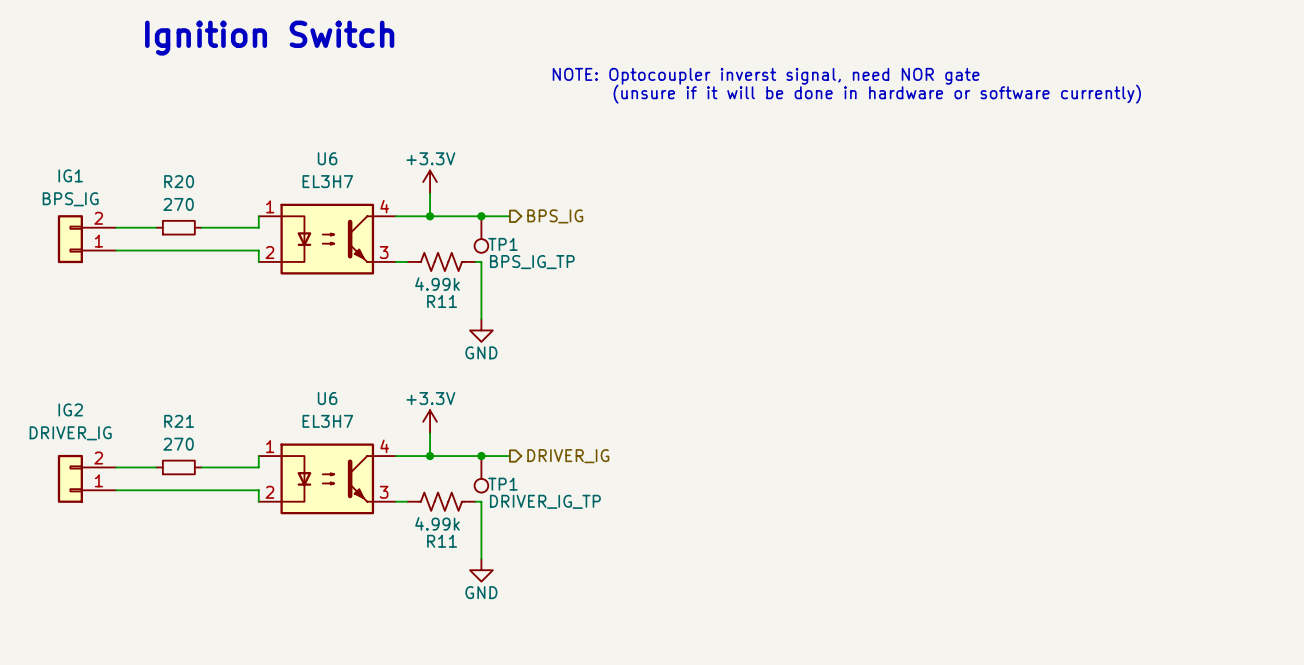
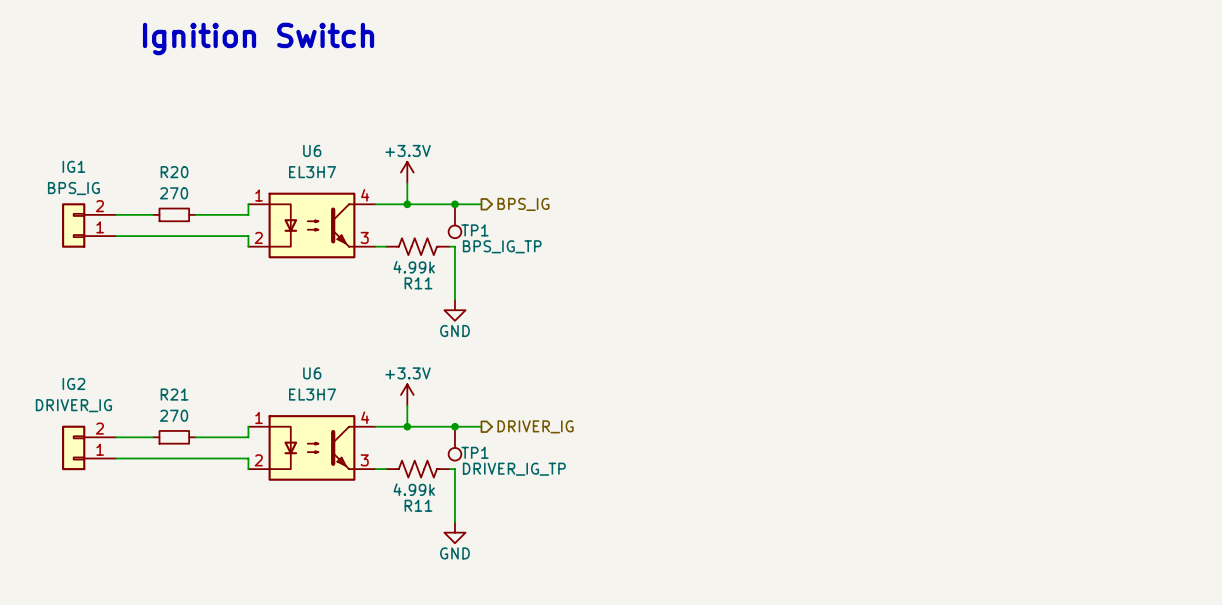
text: NOTE: Optocoupler inverst signal, need NOR gate (766, 76) -> none
text: (unsure if it will be done in hardware or software currently) (877, 94) -> none

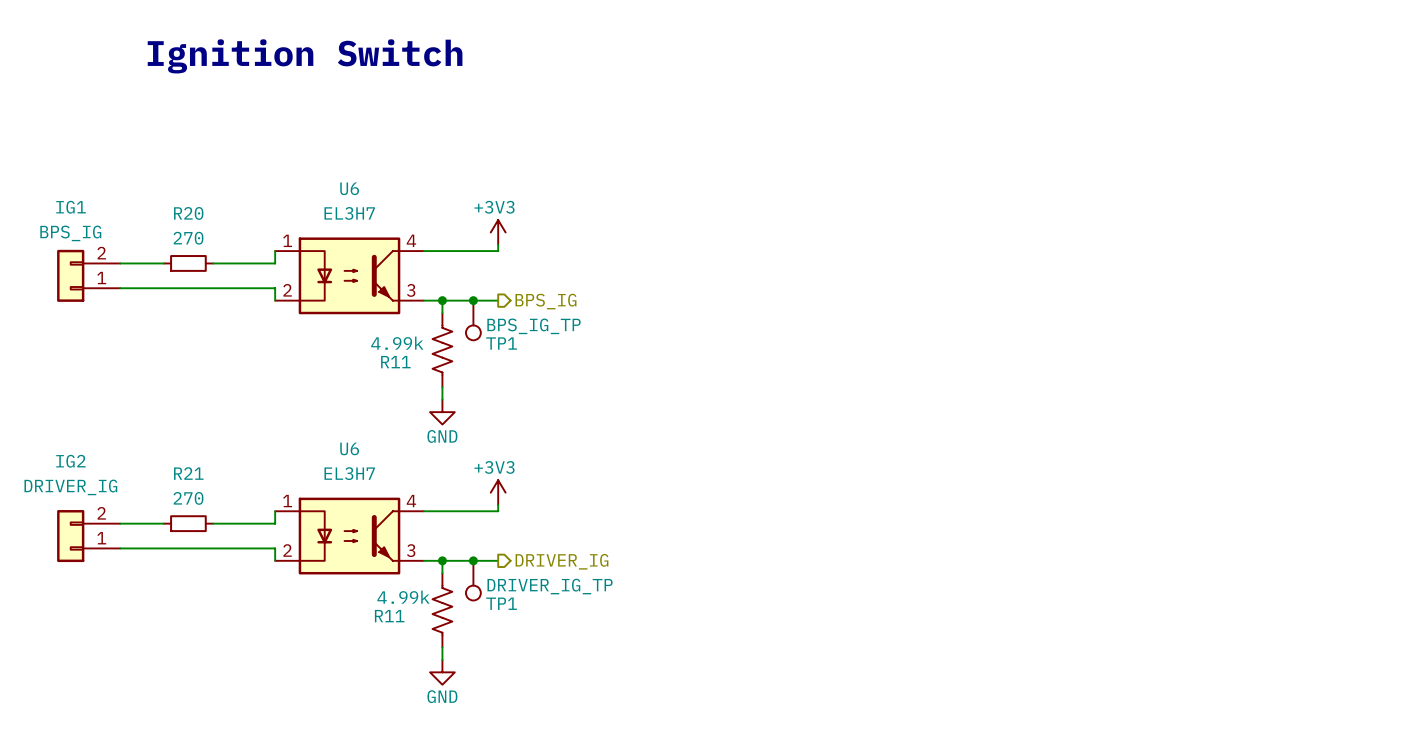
power symbol: +3.3V (407, 172) -> none
wire: (407, 183) (407, 204) -> none
power symbol: none -> +3V3 (498, 232)
junction: (407, 204) -> none
wire: (439, 204) (481, 204) -> (498, 251) (498, 244)
junction: (454, 204) -> none
hierarchical label position: BPS_IG (523, 204) -> BPS_IG (545, 301)
TP1 position: (454, 221) -> (473, 320)
TP1 name position: TP1 (474, 230) -> TP1 (501, 343)
wire: none -> (442, 300) (442, 313)
junction: none -> (442, 300)
junction: none -> (473, 300)
R11 rotation: 0° (417, 246) -> 90° clockwise (442, 350)
R11 position: (417, 246) -> (442, 350)
wire: (449, 246) (454, 246) (454, 299) -> none
TP1 value position: BPS_IG_TP (502, 246) -> BPS_IG_TP (534, 326)
R11 value position: 4.99k (414, 267) -> 4.99k (397, 343)
power symbol position: GND (454, 310) -> GND (442, 412)
wire: none -> (442, 387) (442, 399)
power symbol: +3.3V (407, 394) -> none
wire: (407, 405) (407, 426) -> none
power symbol: none -> +3V3 (498, 492)
junction: (407, 426) -> none
wire: (439, 426) (481, 426) -> (498, 511) (498, 505)
junction: (454, 426) -> none
hierarchical label position: DRIVER_IG (535, 426) -> DRIVER_IG (562, 561)
TP1 position: (454, 443) -> (473, 580)
TP1 name position: TP1 (474, 452) -> TP1 (501, 603)
wire: none -> (442, 560) (442, 573)
junction: none -> (442, 560)
junction: none -> (473, 560)
R11 rotation: 0° (417, 469) -> 90° clockwise (442, 610)
R11 position: (417, 469) -> (442, 610)
wire: (449, 469) (454, 469) (454, 522) -> none
TP1 value position: DRIVER_IG_TP (514, 469) -> DRIVER_IG_TP (550, 586)
R11 value position: 4.99k (414, 489) -> 4.99k (403, 597)
power symbol position: GND (454, 532) -> GND (442, 672)
wire: none -> (442, 647) (442, 659)

